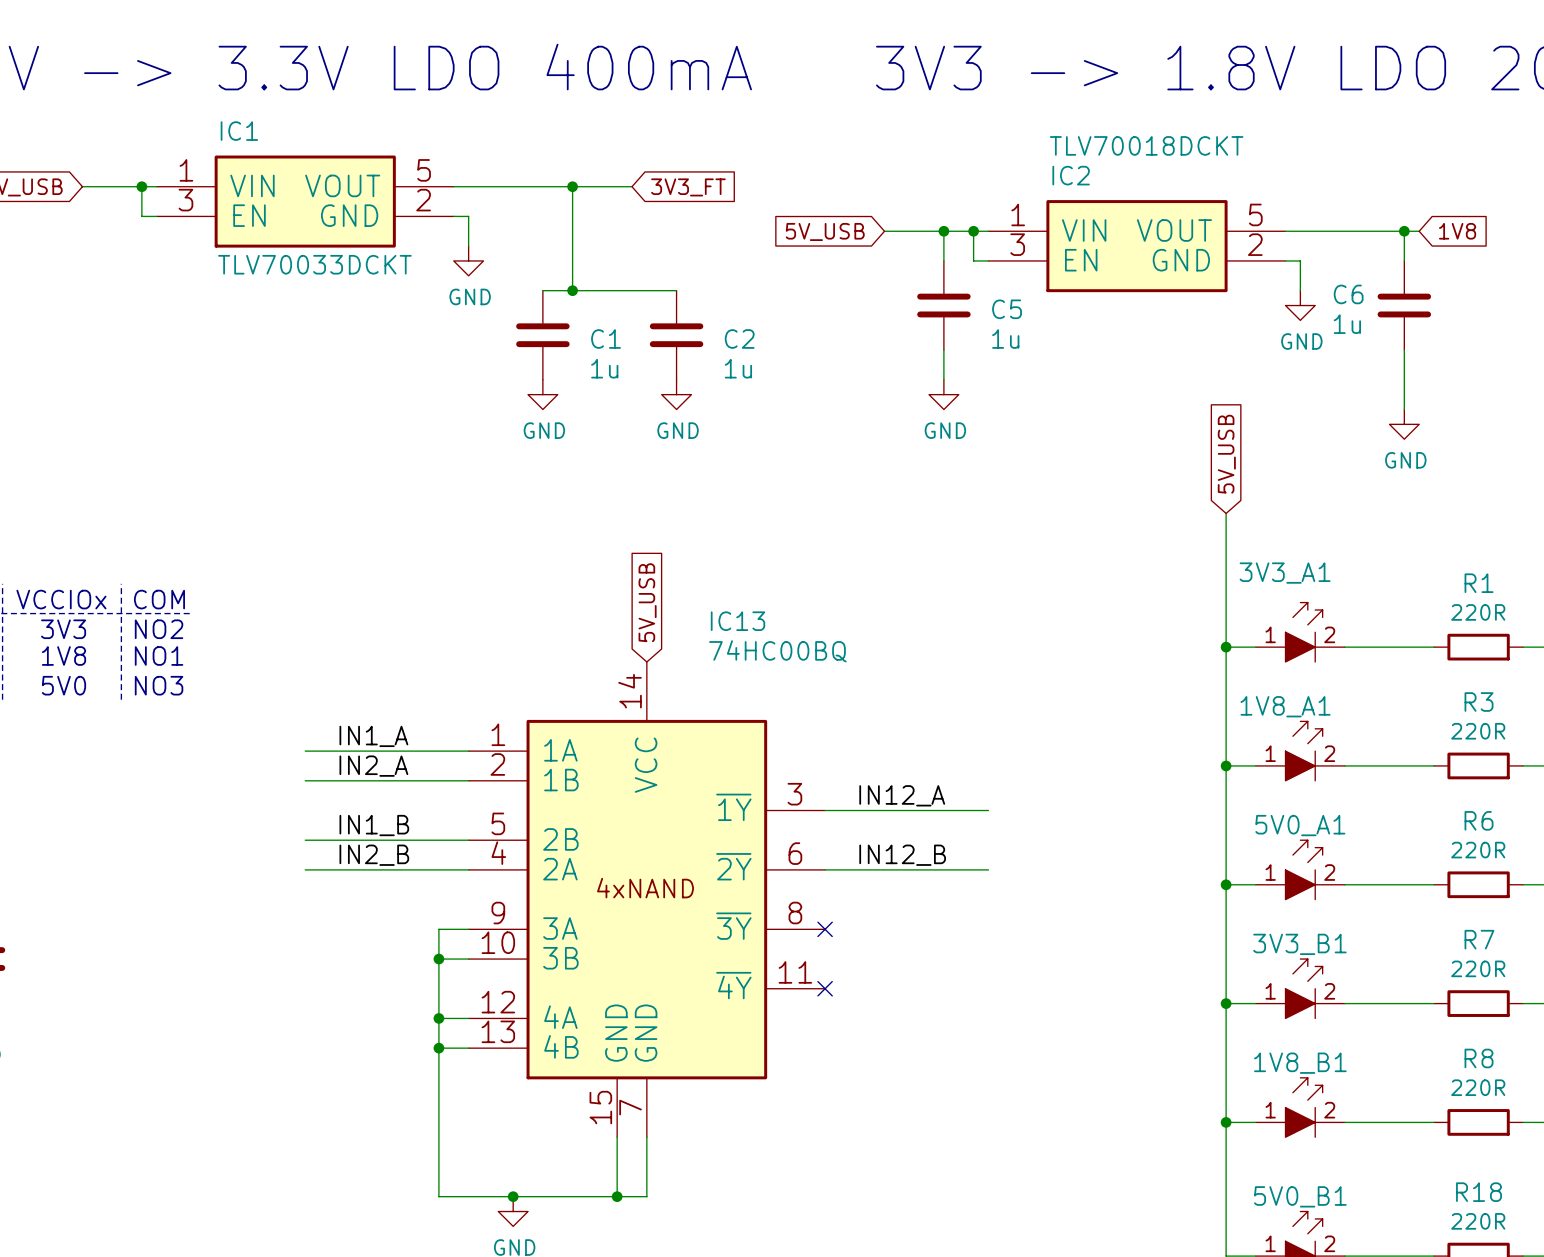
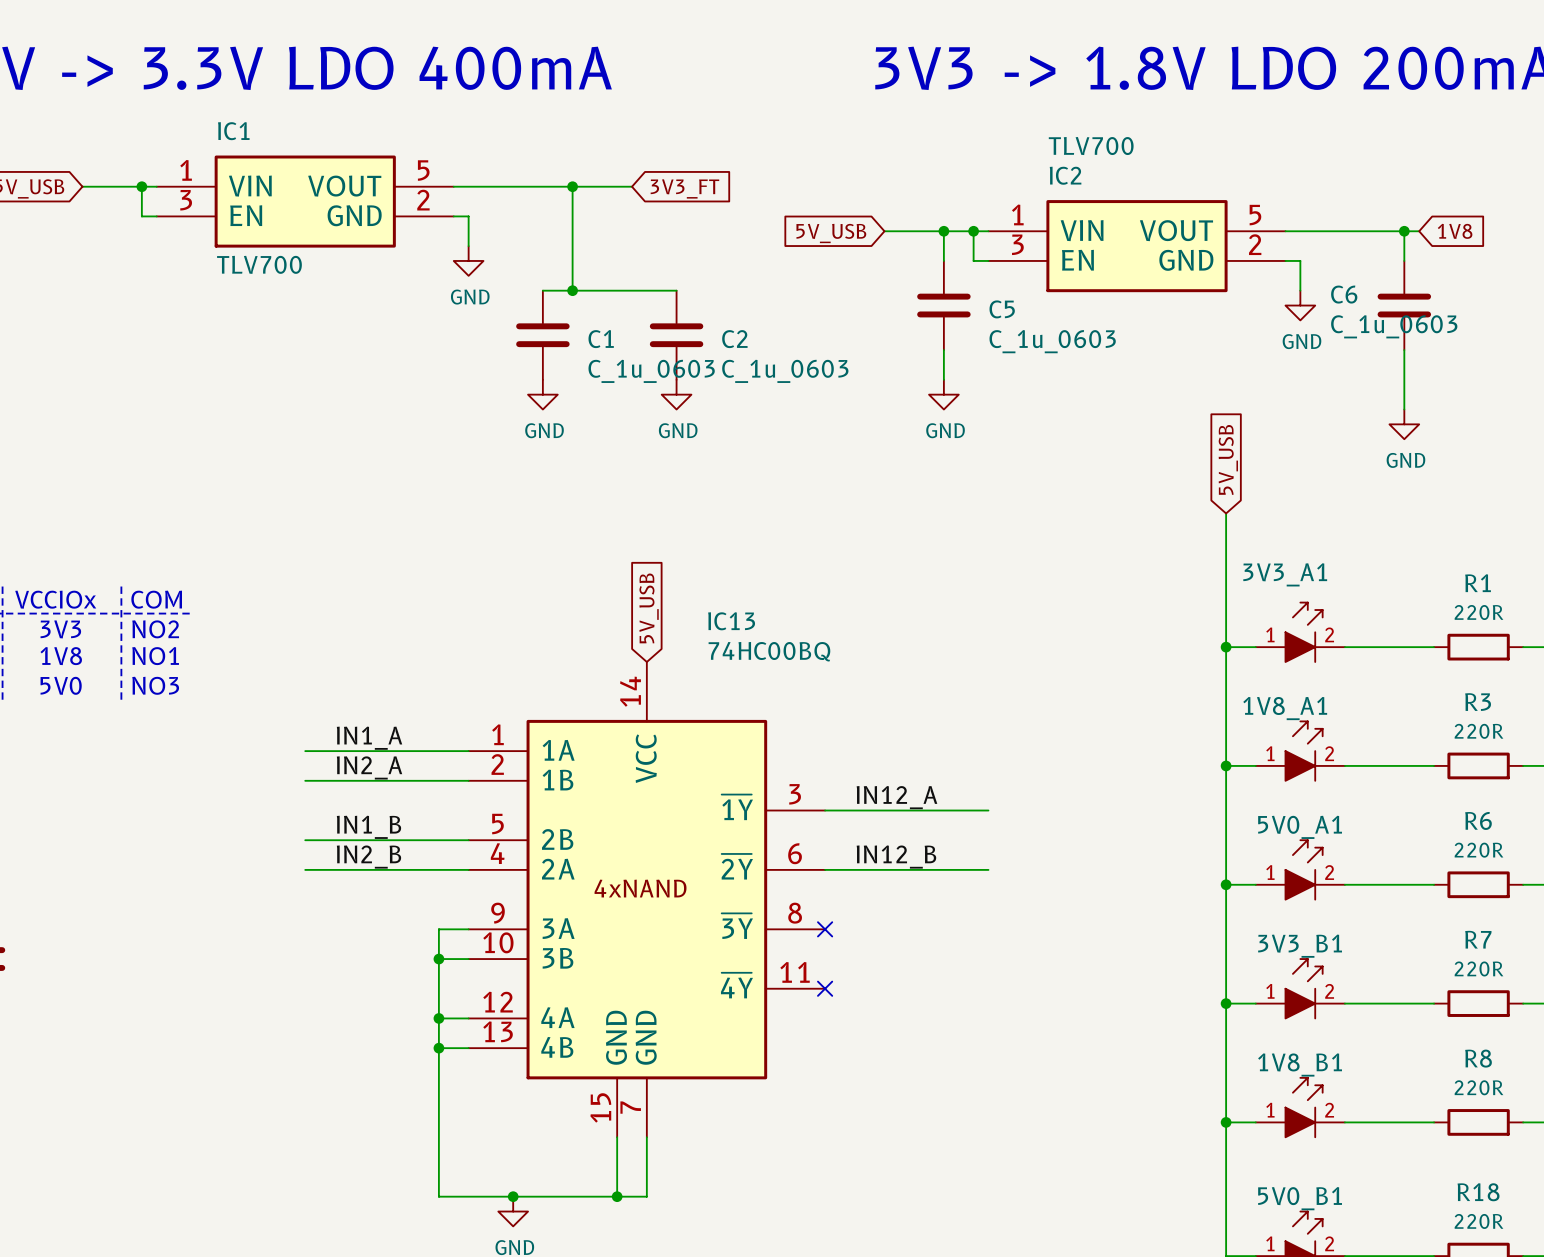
IC2 value: TLV70018DCKT (1146, 145) -> TLV700 (1091, 146)
IC1 value: TLV70033DCKT (314, 264) -> TLV700 (259, 264)
C6 value: 1u (1347, 324) -> C_1u_0603 (1394, 326)
C5 value: 1u (1005, 339) -> C_1u_0603 (1052, 341)
C1 value: 1u (604, 368) -> C_1u_0603 (651, 371)
C2 value: 1u (738, 368) -> C_1u_0603 (785, 371)

